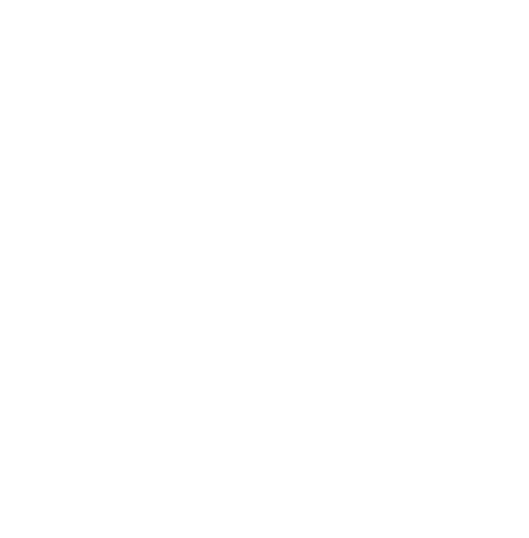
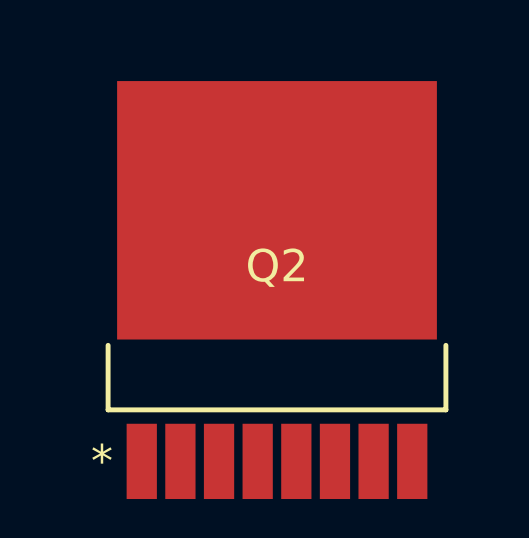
Q2: none -> (277, 290)

